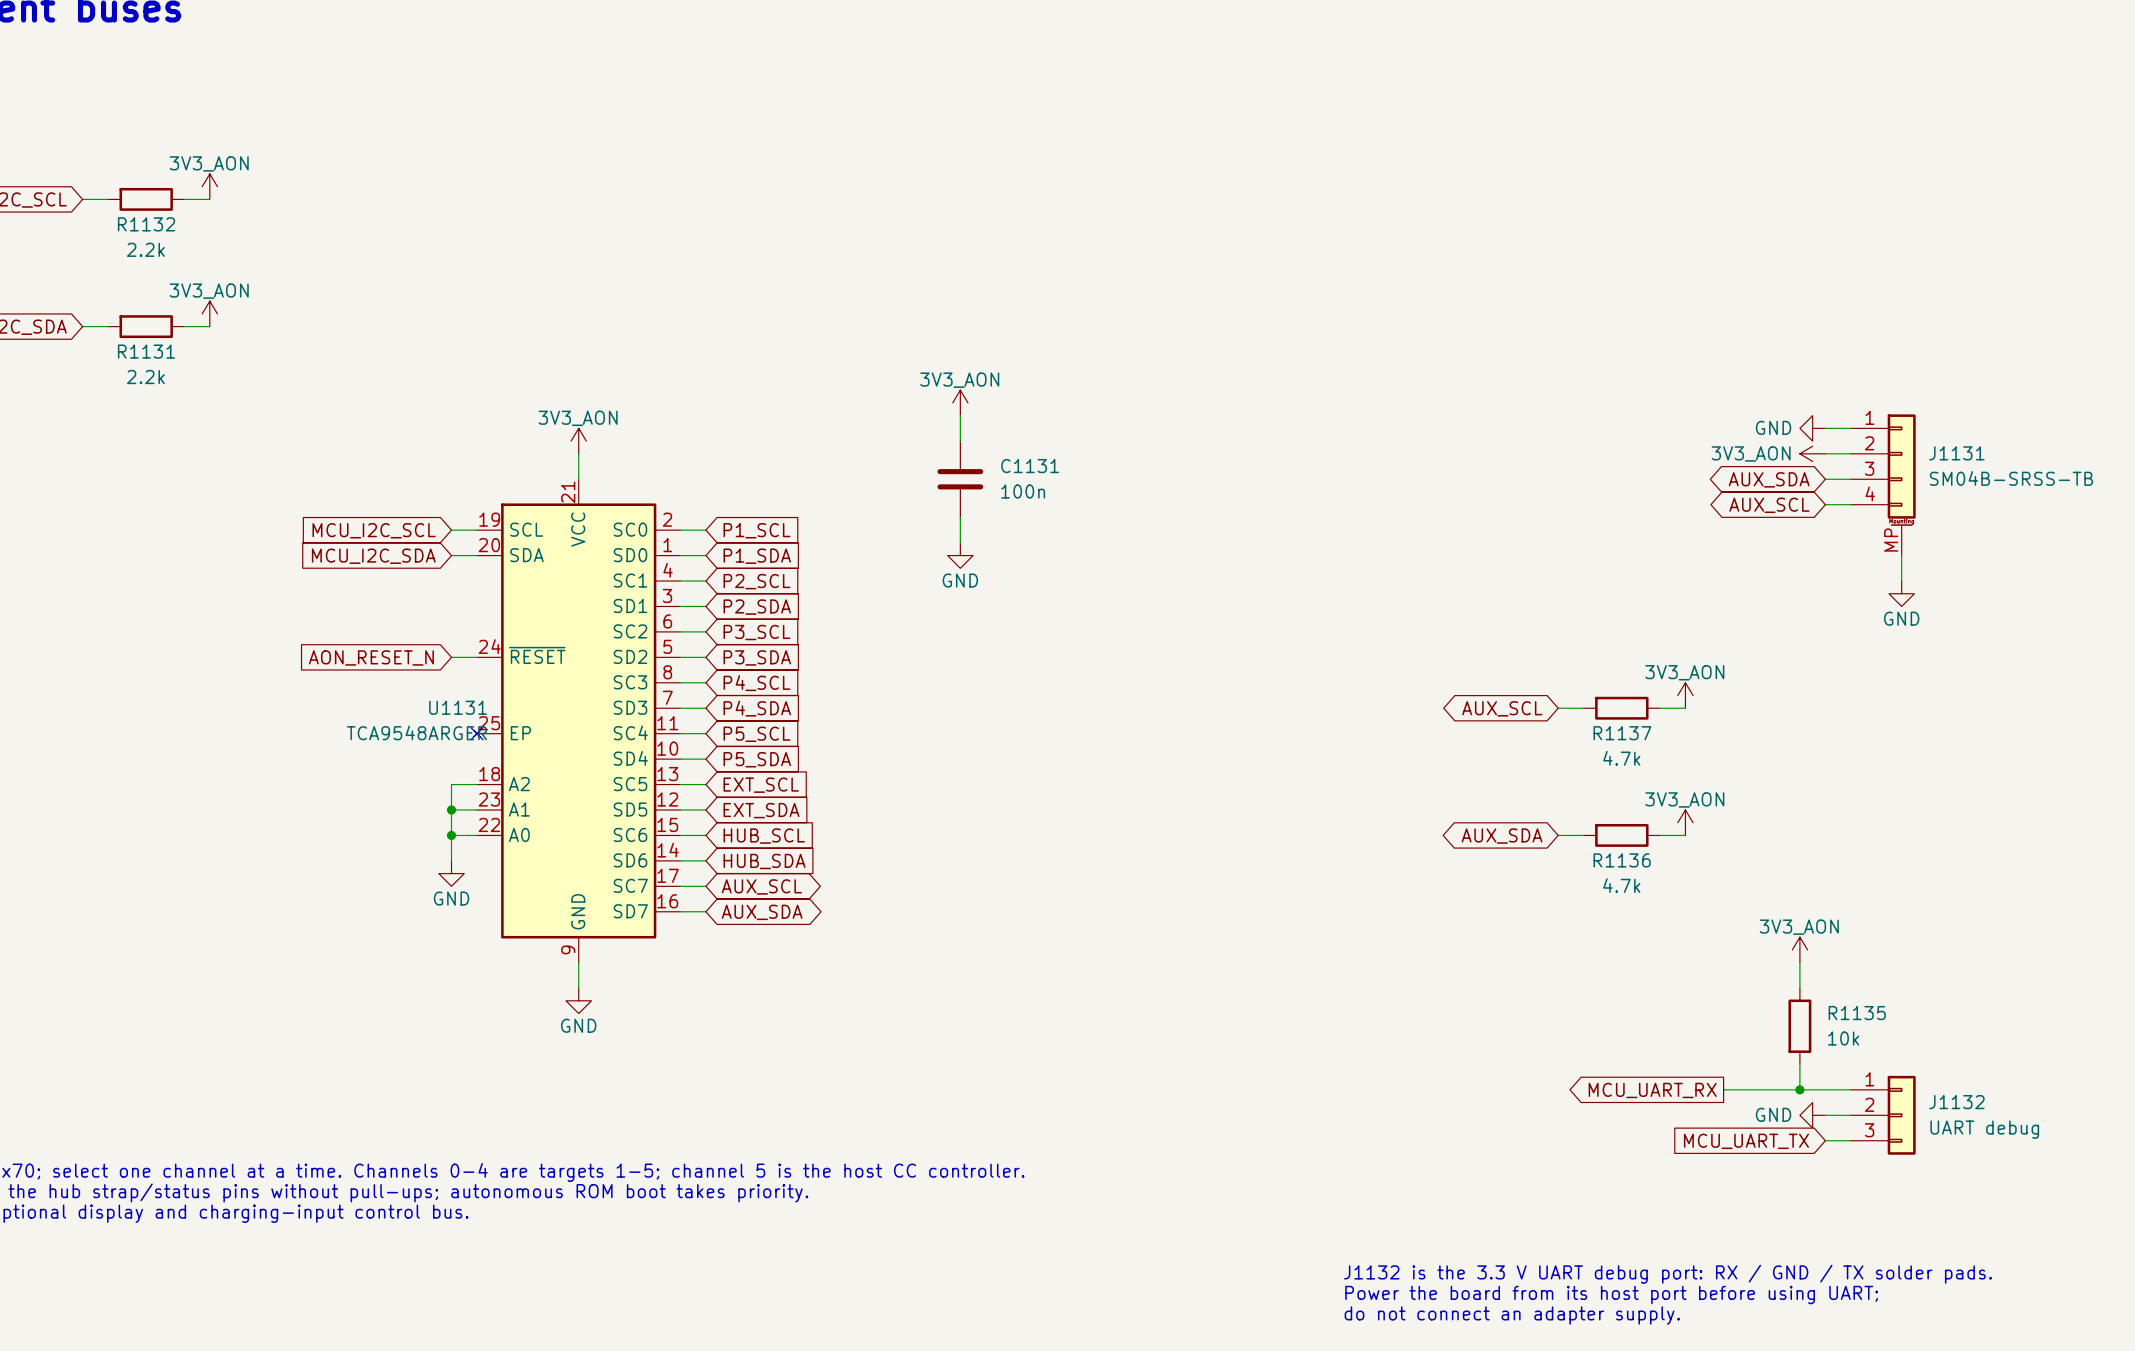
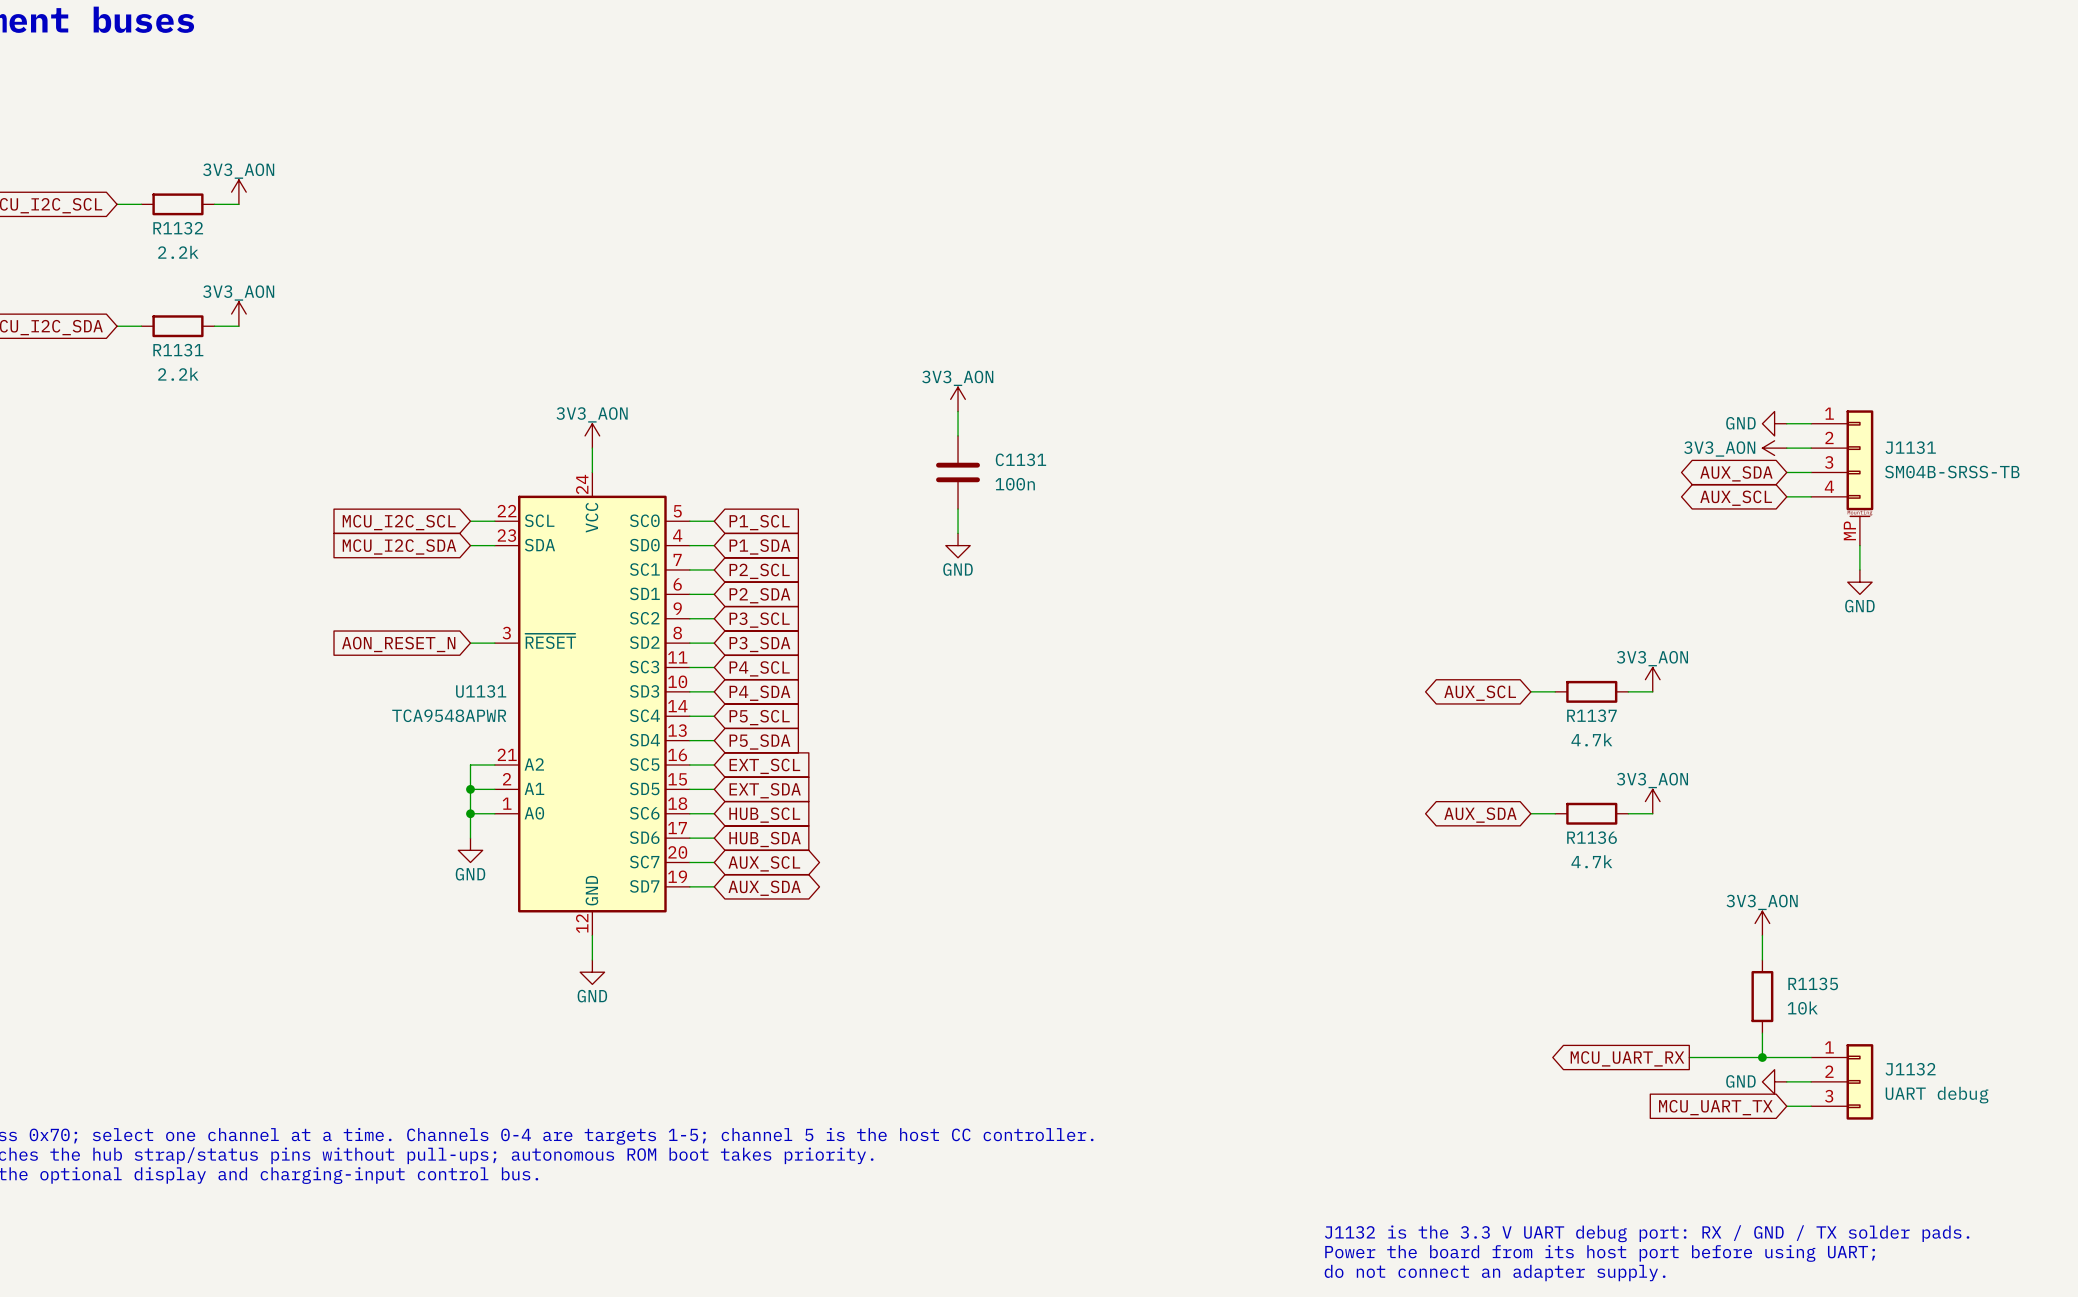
U1131 symbol: [473, 479, 681, 963] -> [494, 472, 690, 936]
U1131 value: TCA9548ARGER (416, 732) -> TCA9548APWR (449, 715)
no-connect mark: (476, 733) -> none

